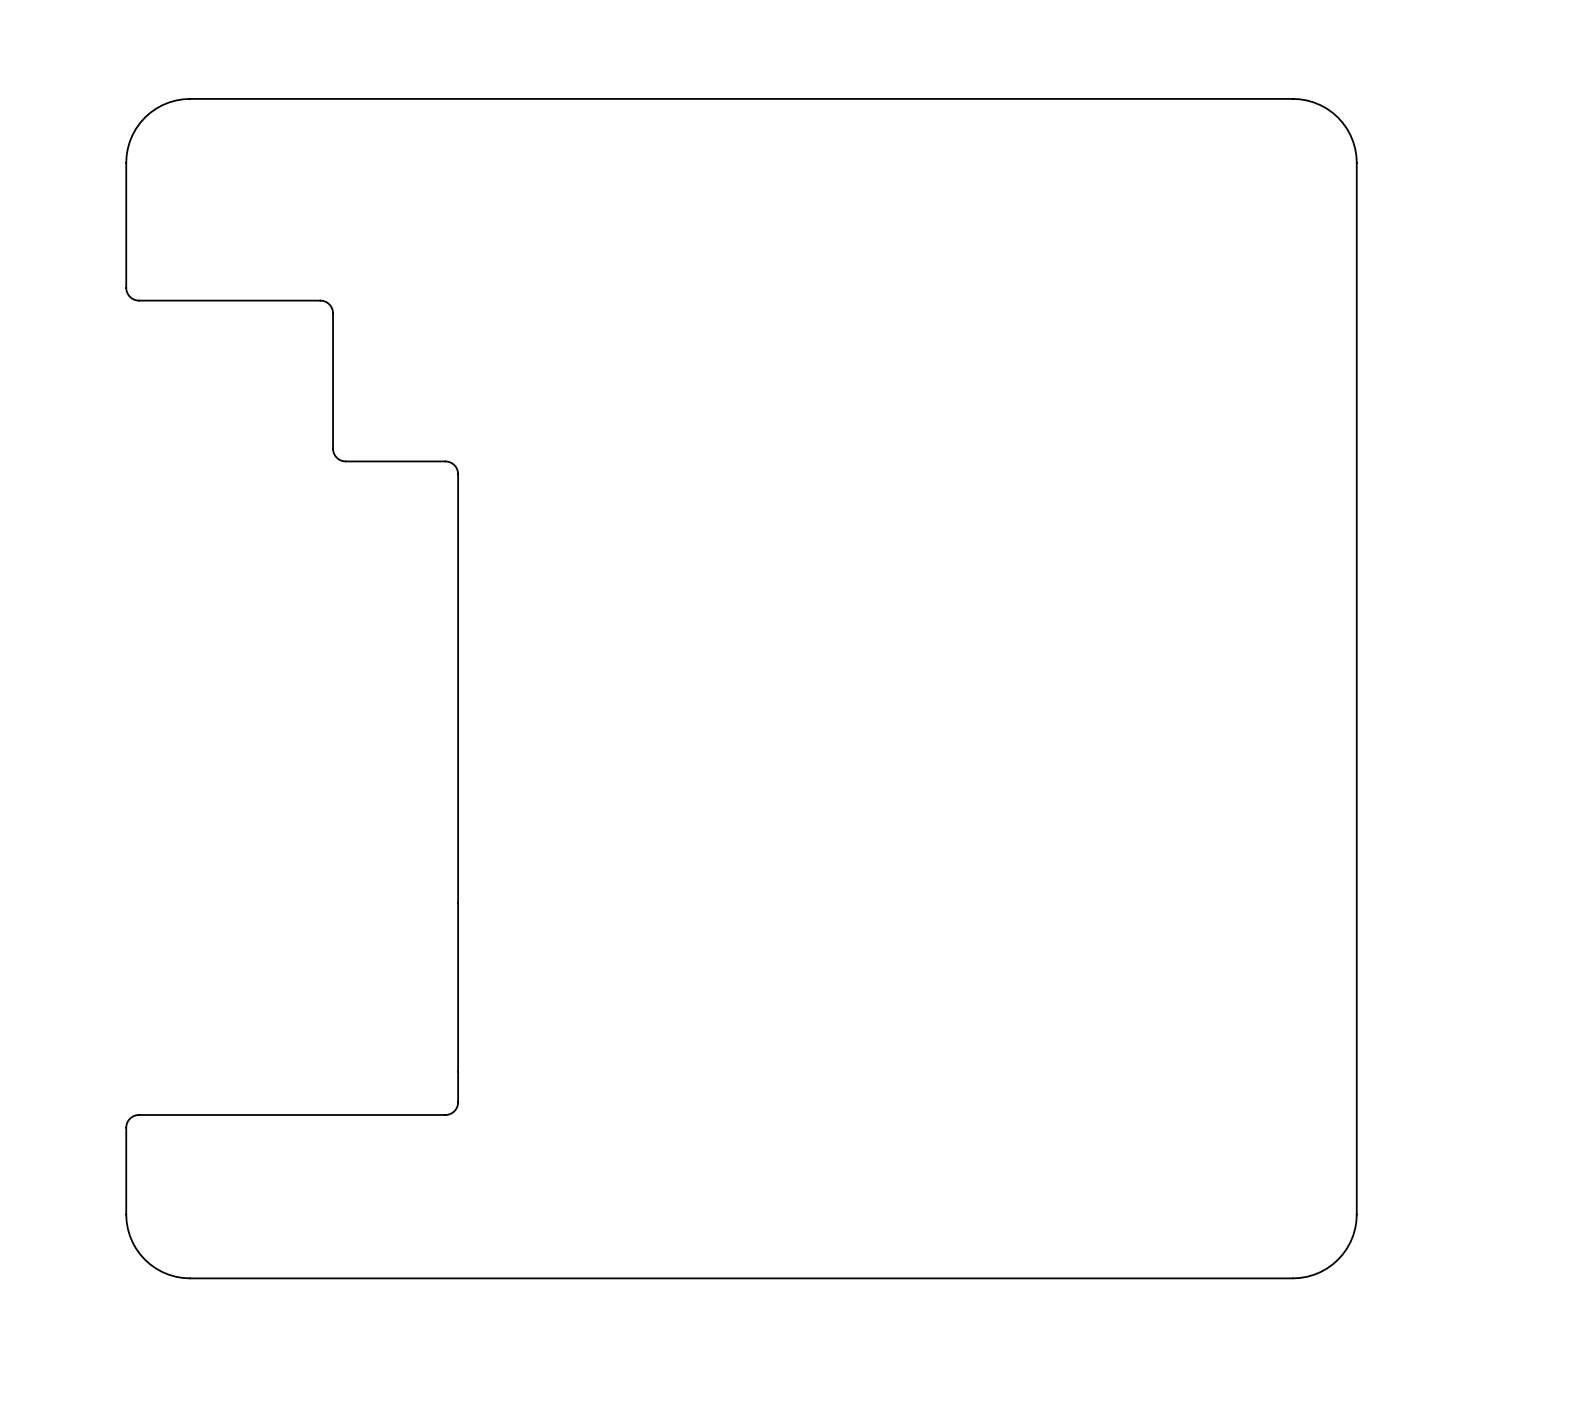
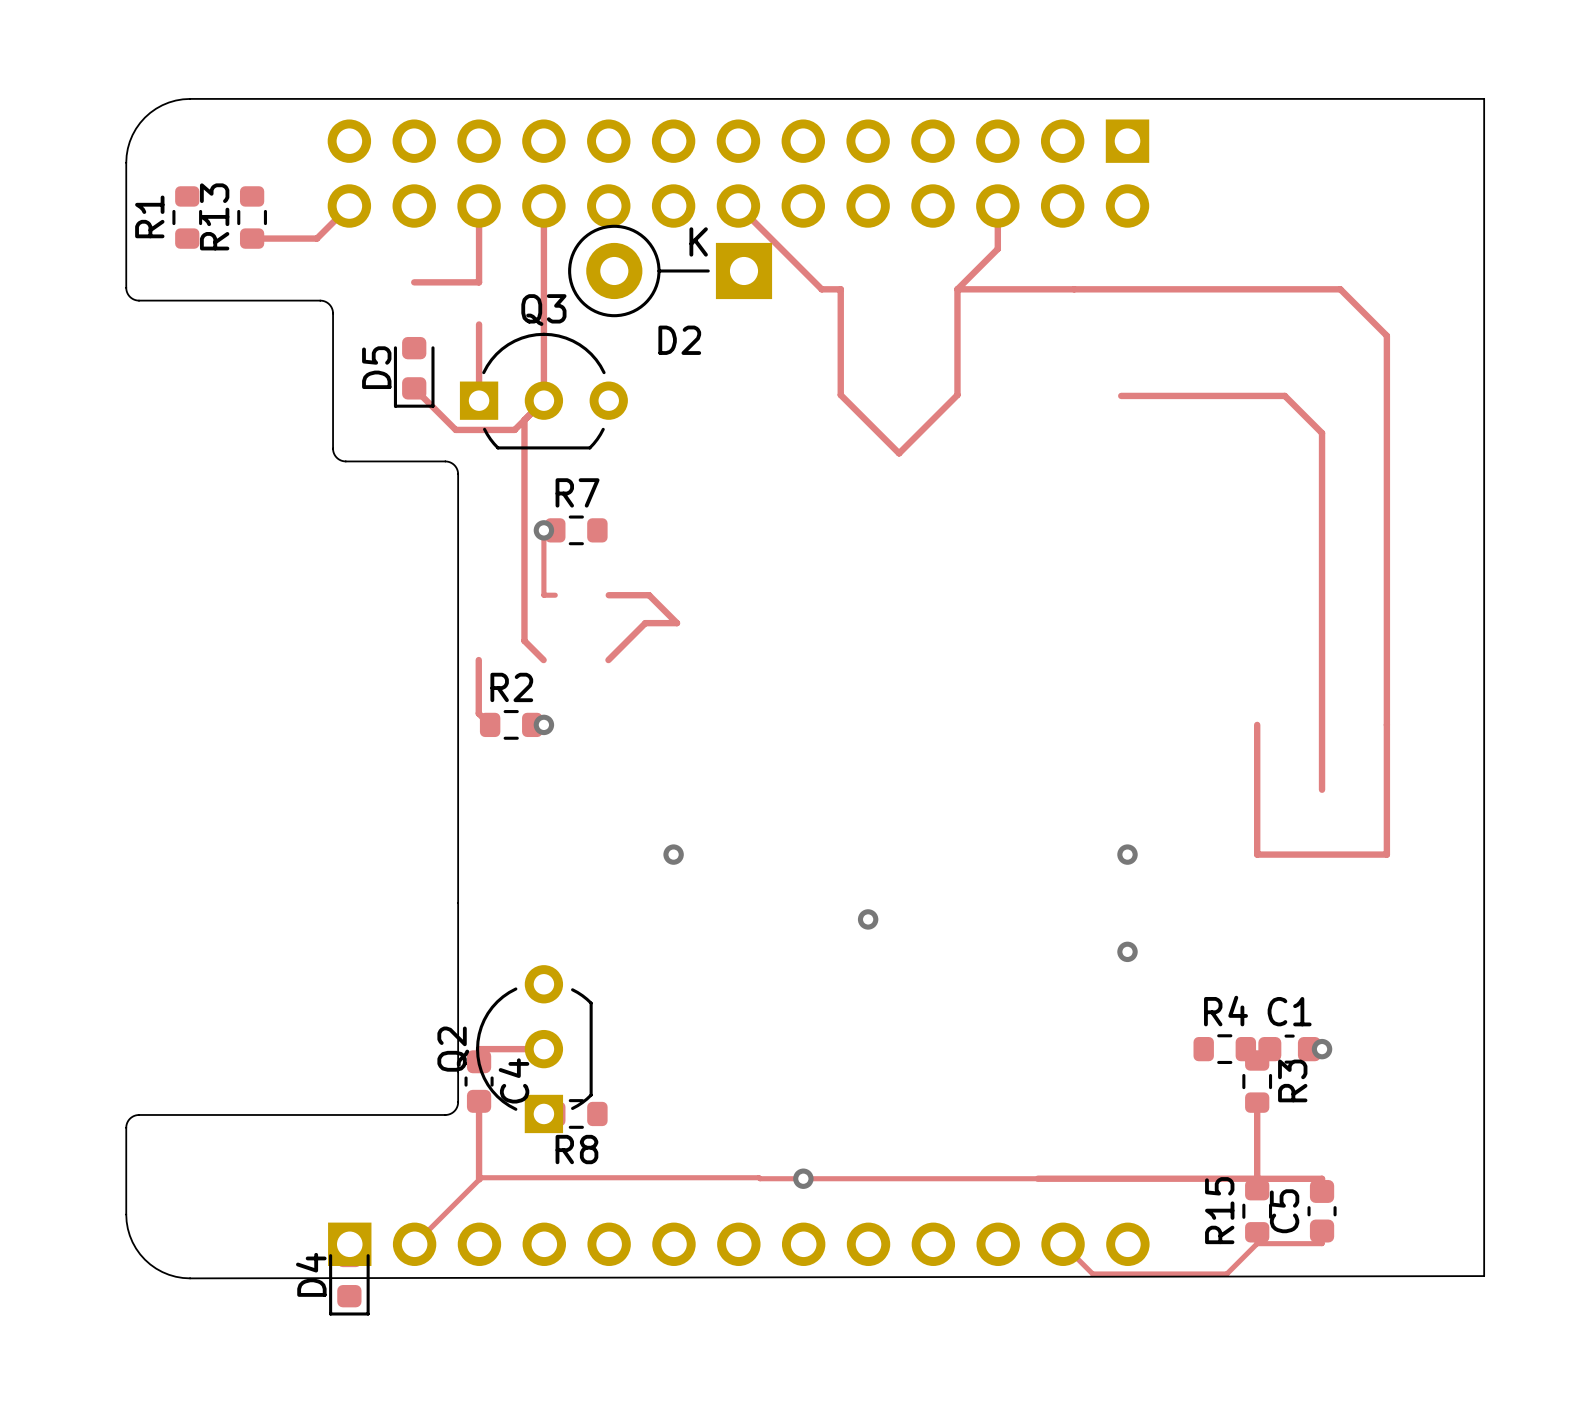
board edge: (1292, 98) (1314, 102) (1326, 108) (1338, 117) (1350, 135) (1355, 148) (1356, 162) (1356, 1214) (1355, 1228) (1350, 1242) (1338, 1259) (1320, 1272) (1307, 1276) (1292, 1278) (190, 1278) -> (1292, 98) (1484, 98) (1484, 1276) (190, 1278)
part: none -> (738, 173)
track: none -> (349, 206) (316, 238) (252, 238)
track: none -> (479, 206) (479, 282) (414, 282)
track: none -> (543, 206) (543, 400) (514, 429) (455, 429) (414, 388)
track: none -> (738, 206) (821, 289) (840, 289) (840, 395) (899, 453) (957, 395) (957, 289)
track: none -> (997, 206) (997, 248) (957, 289)
R1: none -> (187, 217)
R13: none -> (252, 217)
D2: none -> (670, 270)
track: none -> (957, 289) (1340, 289) (1386, 335) (1386, 854) (1257, 854) (1257, 724)
track: none -> (479, 324) (479, 400)
D5: none -> (414, 372)
Q3: none -> (543, 391)
track: none -> (1121, 395) (1284, 395) (1322, 433) (1322, 789)
track: none -> (524, 420) (524, 640) (543, 660)
track: none -> (543, 530) (543, 595) (555, 595)
via: none -> (543, 530)
R7: none -> (576, 530)
track: none -> (608, 595) (649, 595) (677, 623) (645, 623) (608, 660)
track: none -> (478, 660) (478, 713) (490, 724)
R2: none -> (511, 724)
via: none -> (543, 724)
via: none -> (673, 854)
via: none -> (1127, 854)
via: none -> (868, 919)
via: none -> (1127, 951)
Q2: none -> (534, 1049)
track: none -> (543, 1049) (479, 1049) (479, 1061)
R4: none -> (1224, 1049)
C1: none -> (1289, 1049)
via: none -> (1322, 1049)
C4: none -> (479, 1081)
R3: none -> (1257, 1081)
track: none -> (479, 1101) (479, 1179)
track: none -> (1257, 1102) (1257, 1191)
R8: none -> (576, 1113)
via: none -> (803, 1178)
track: none -> (1322, 1190) (1322, 1178) (481, 1177) (414, 1244)
R15: none -> (1257, 1211)
C5: none -> (1322, 1211)
track: none -> (1322, 1232) (1322, 1243) (1257, 1243)
track: none -> (1257, 1243) (1226, 1273) (1092, 1273) (1063, 1244)
part: none -> (738, 1244)
D4: none -> (349, 1280)

